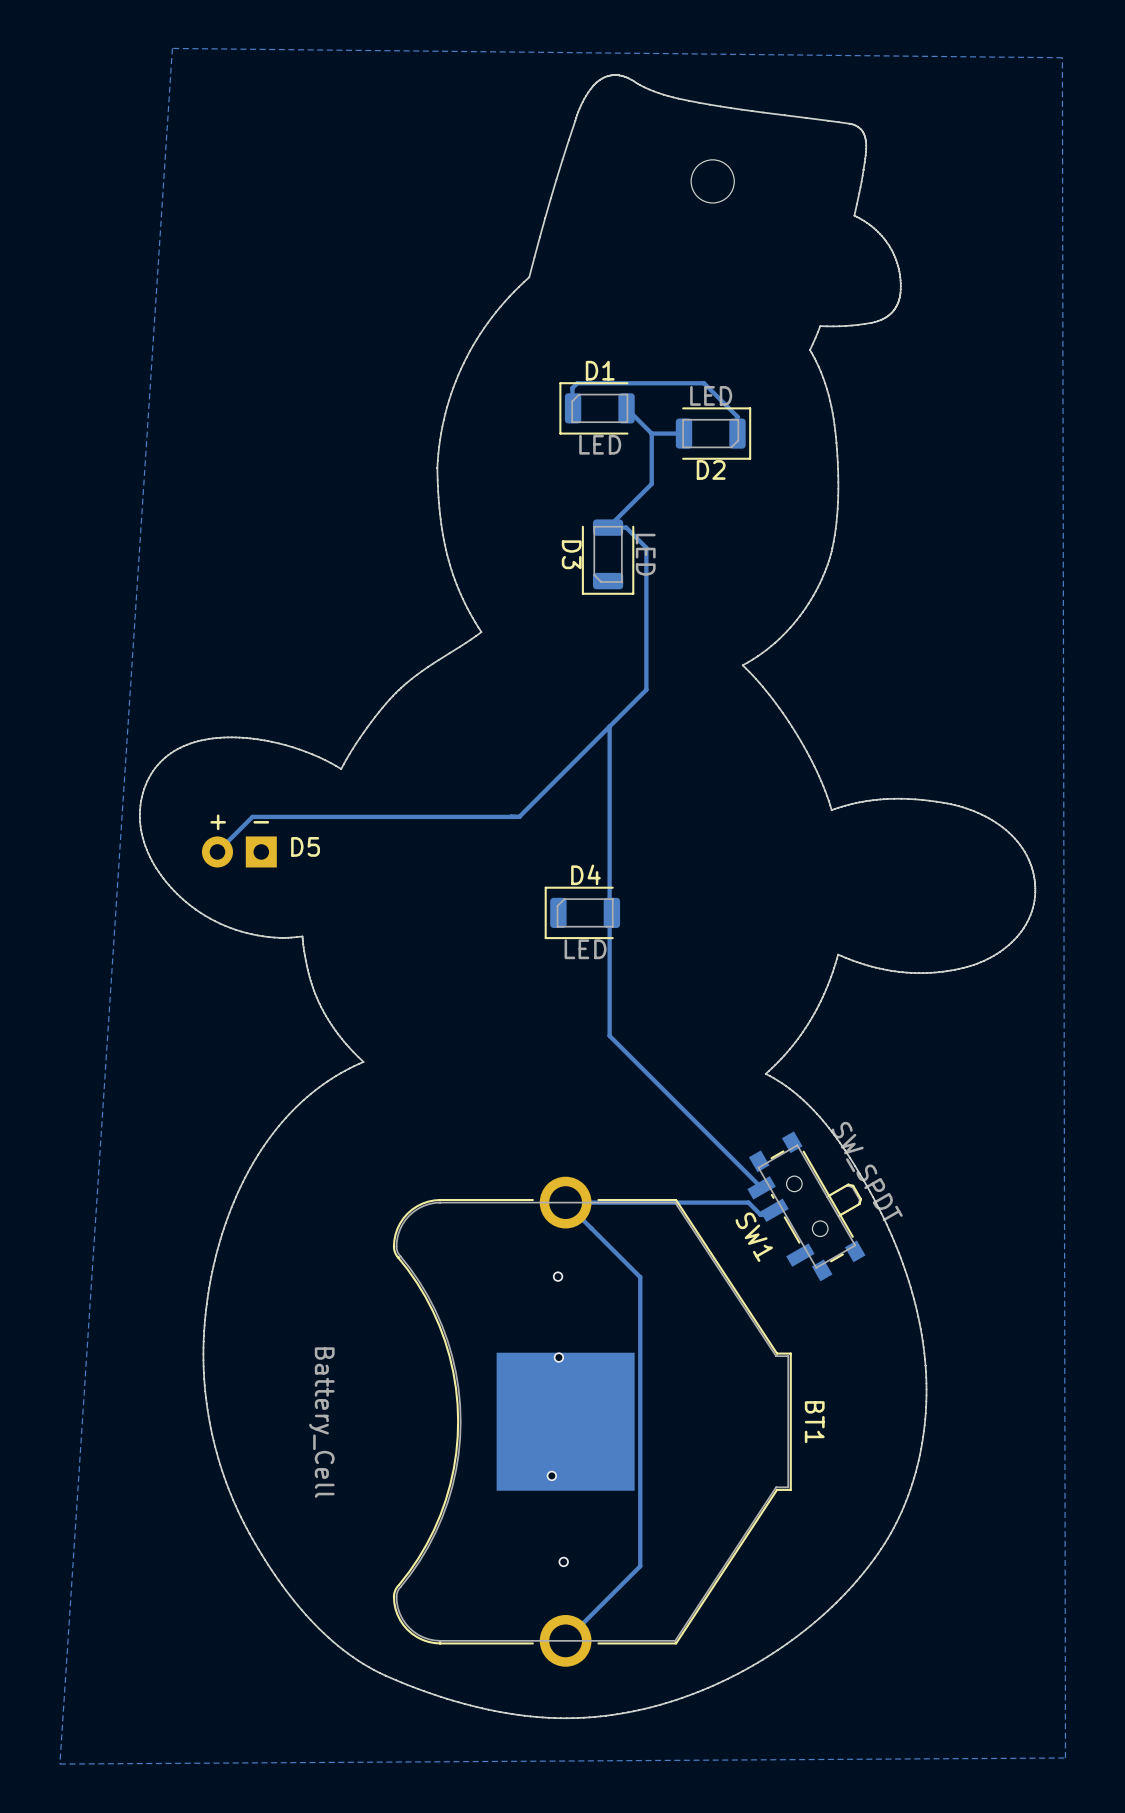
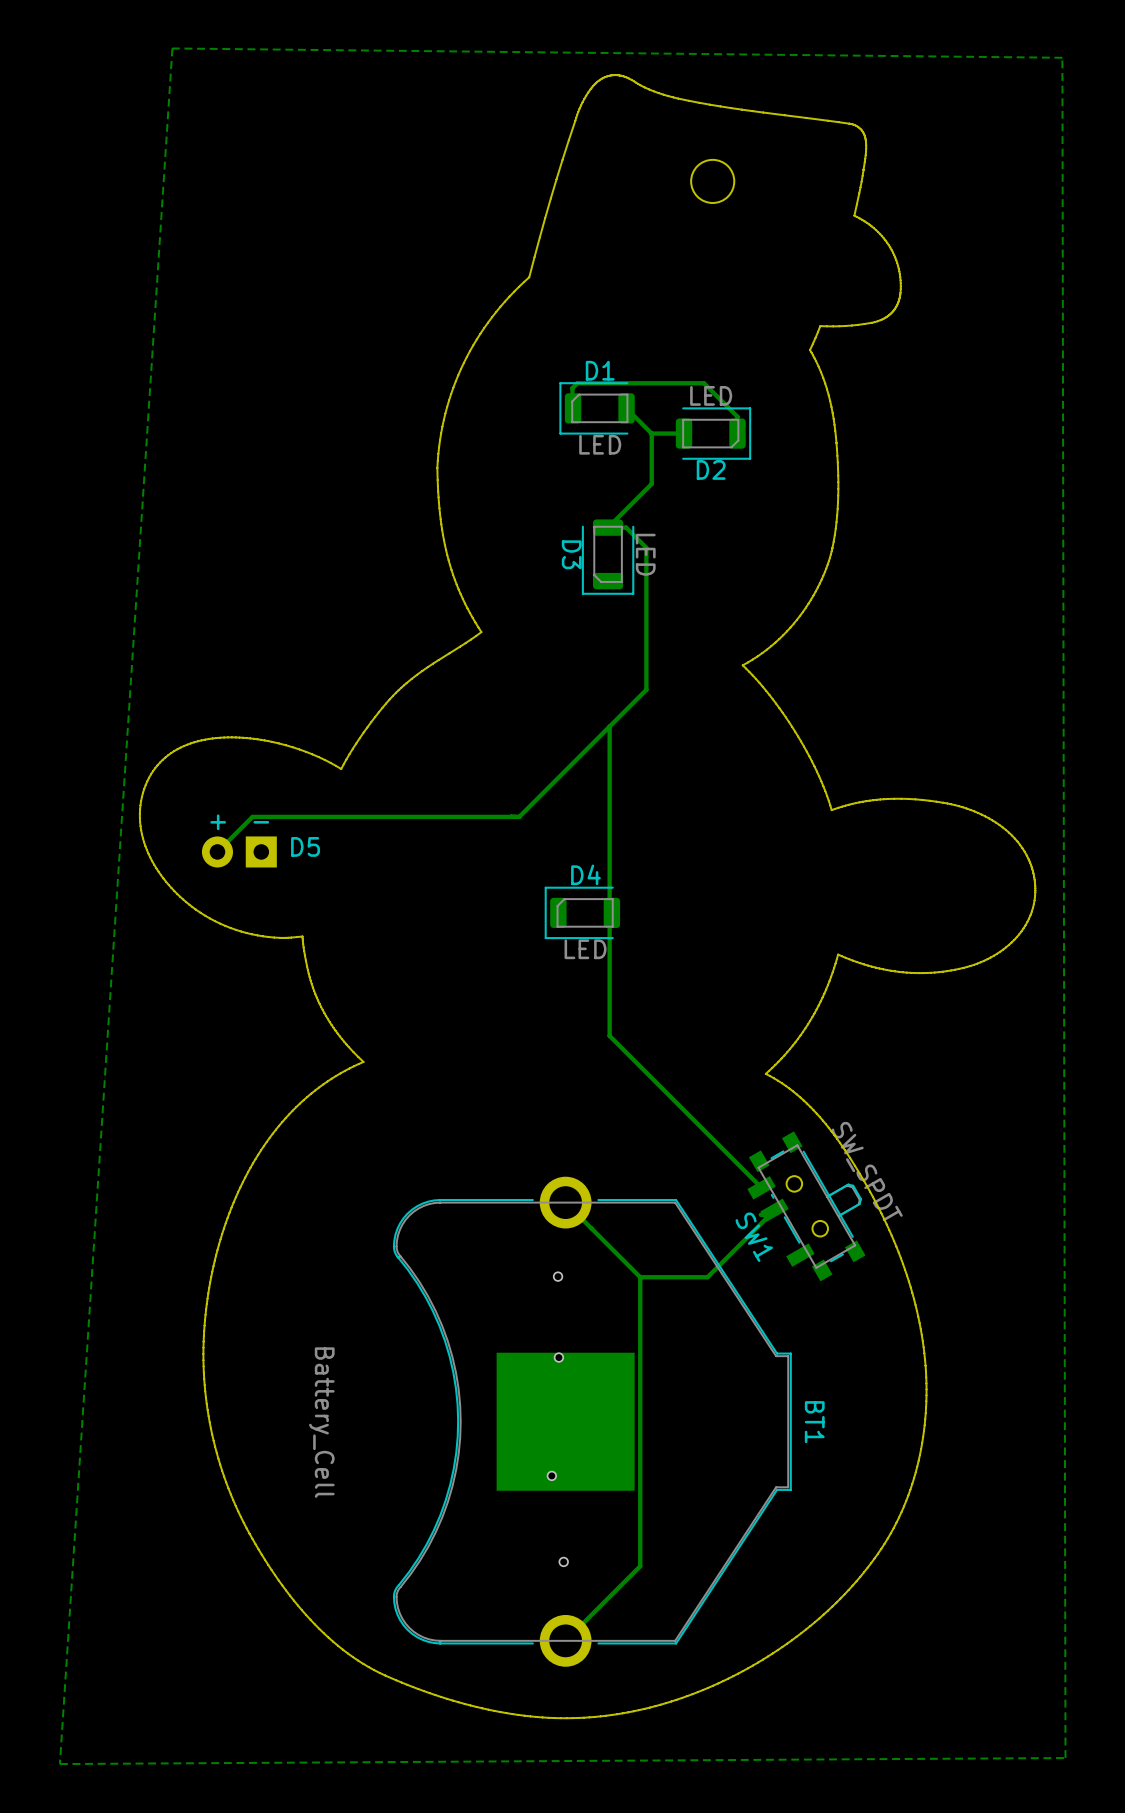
track: (565, 1202) (748, 1202) (760, 1214) -> none
track: none -> (769, 1214) (707, 1277) (640, 1277)

